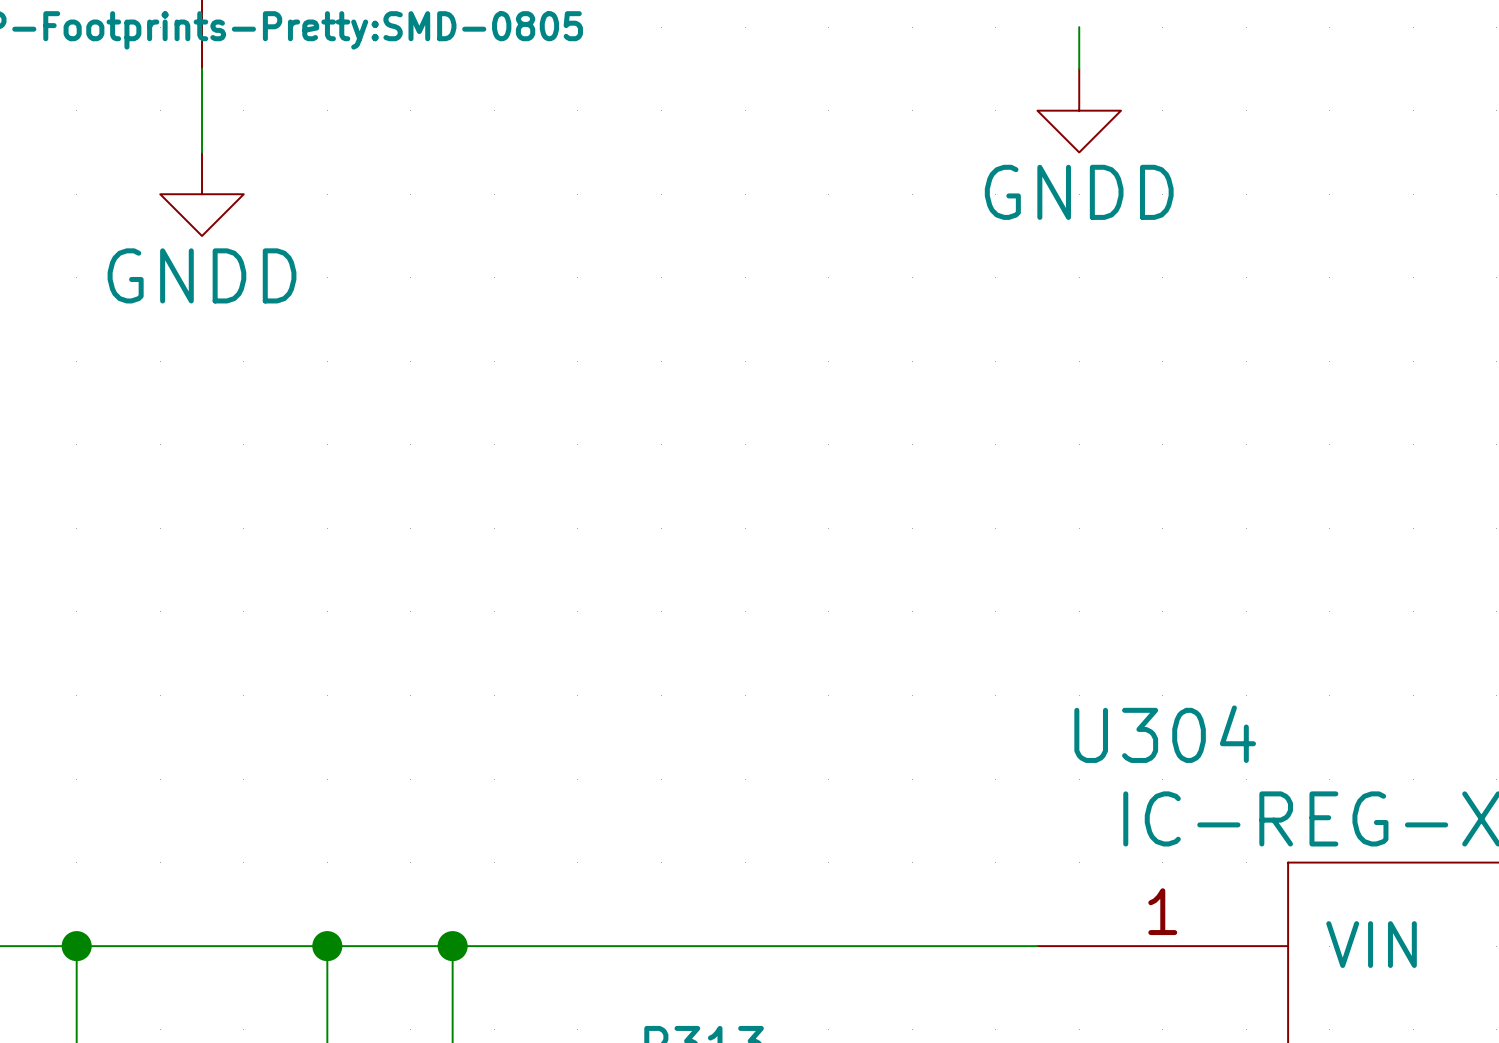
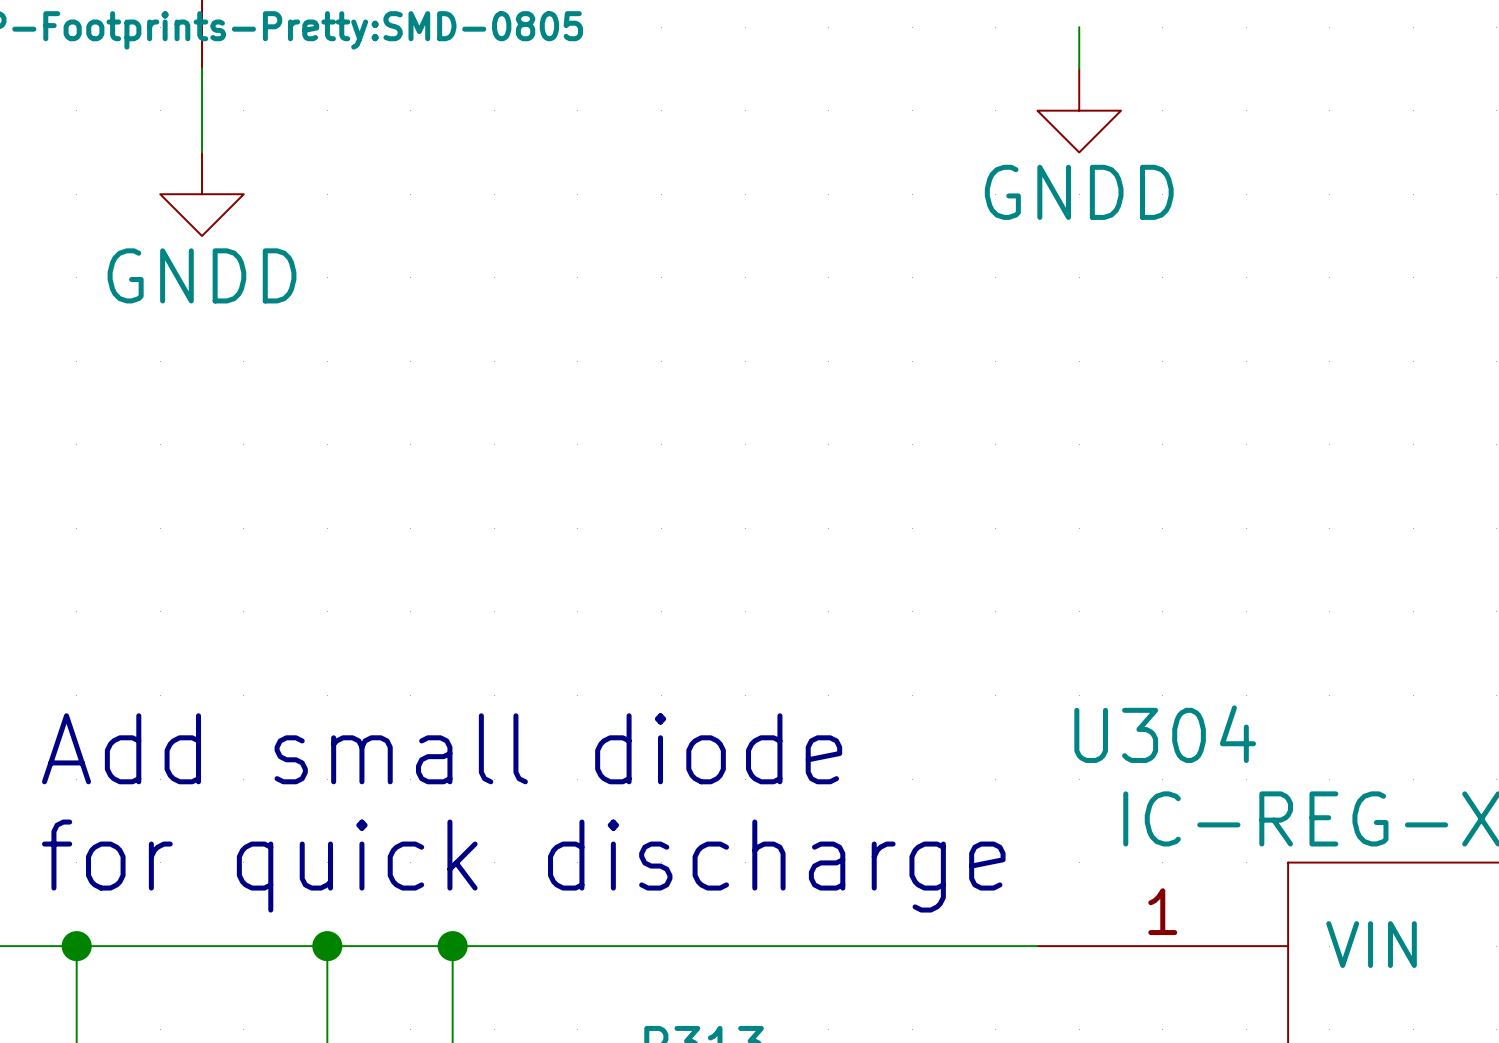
text: none -> Add small diode (442, 748)
text: none -> for quick discharge (523, 866)

